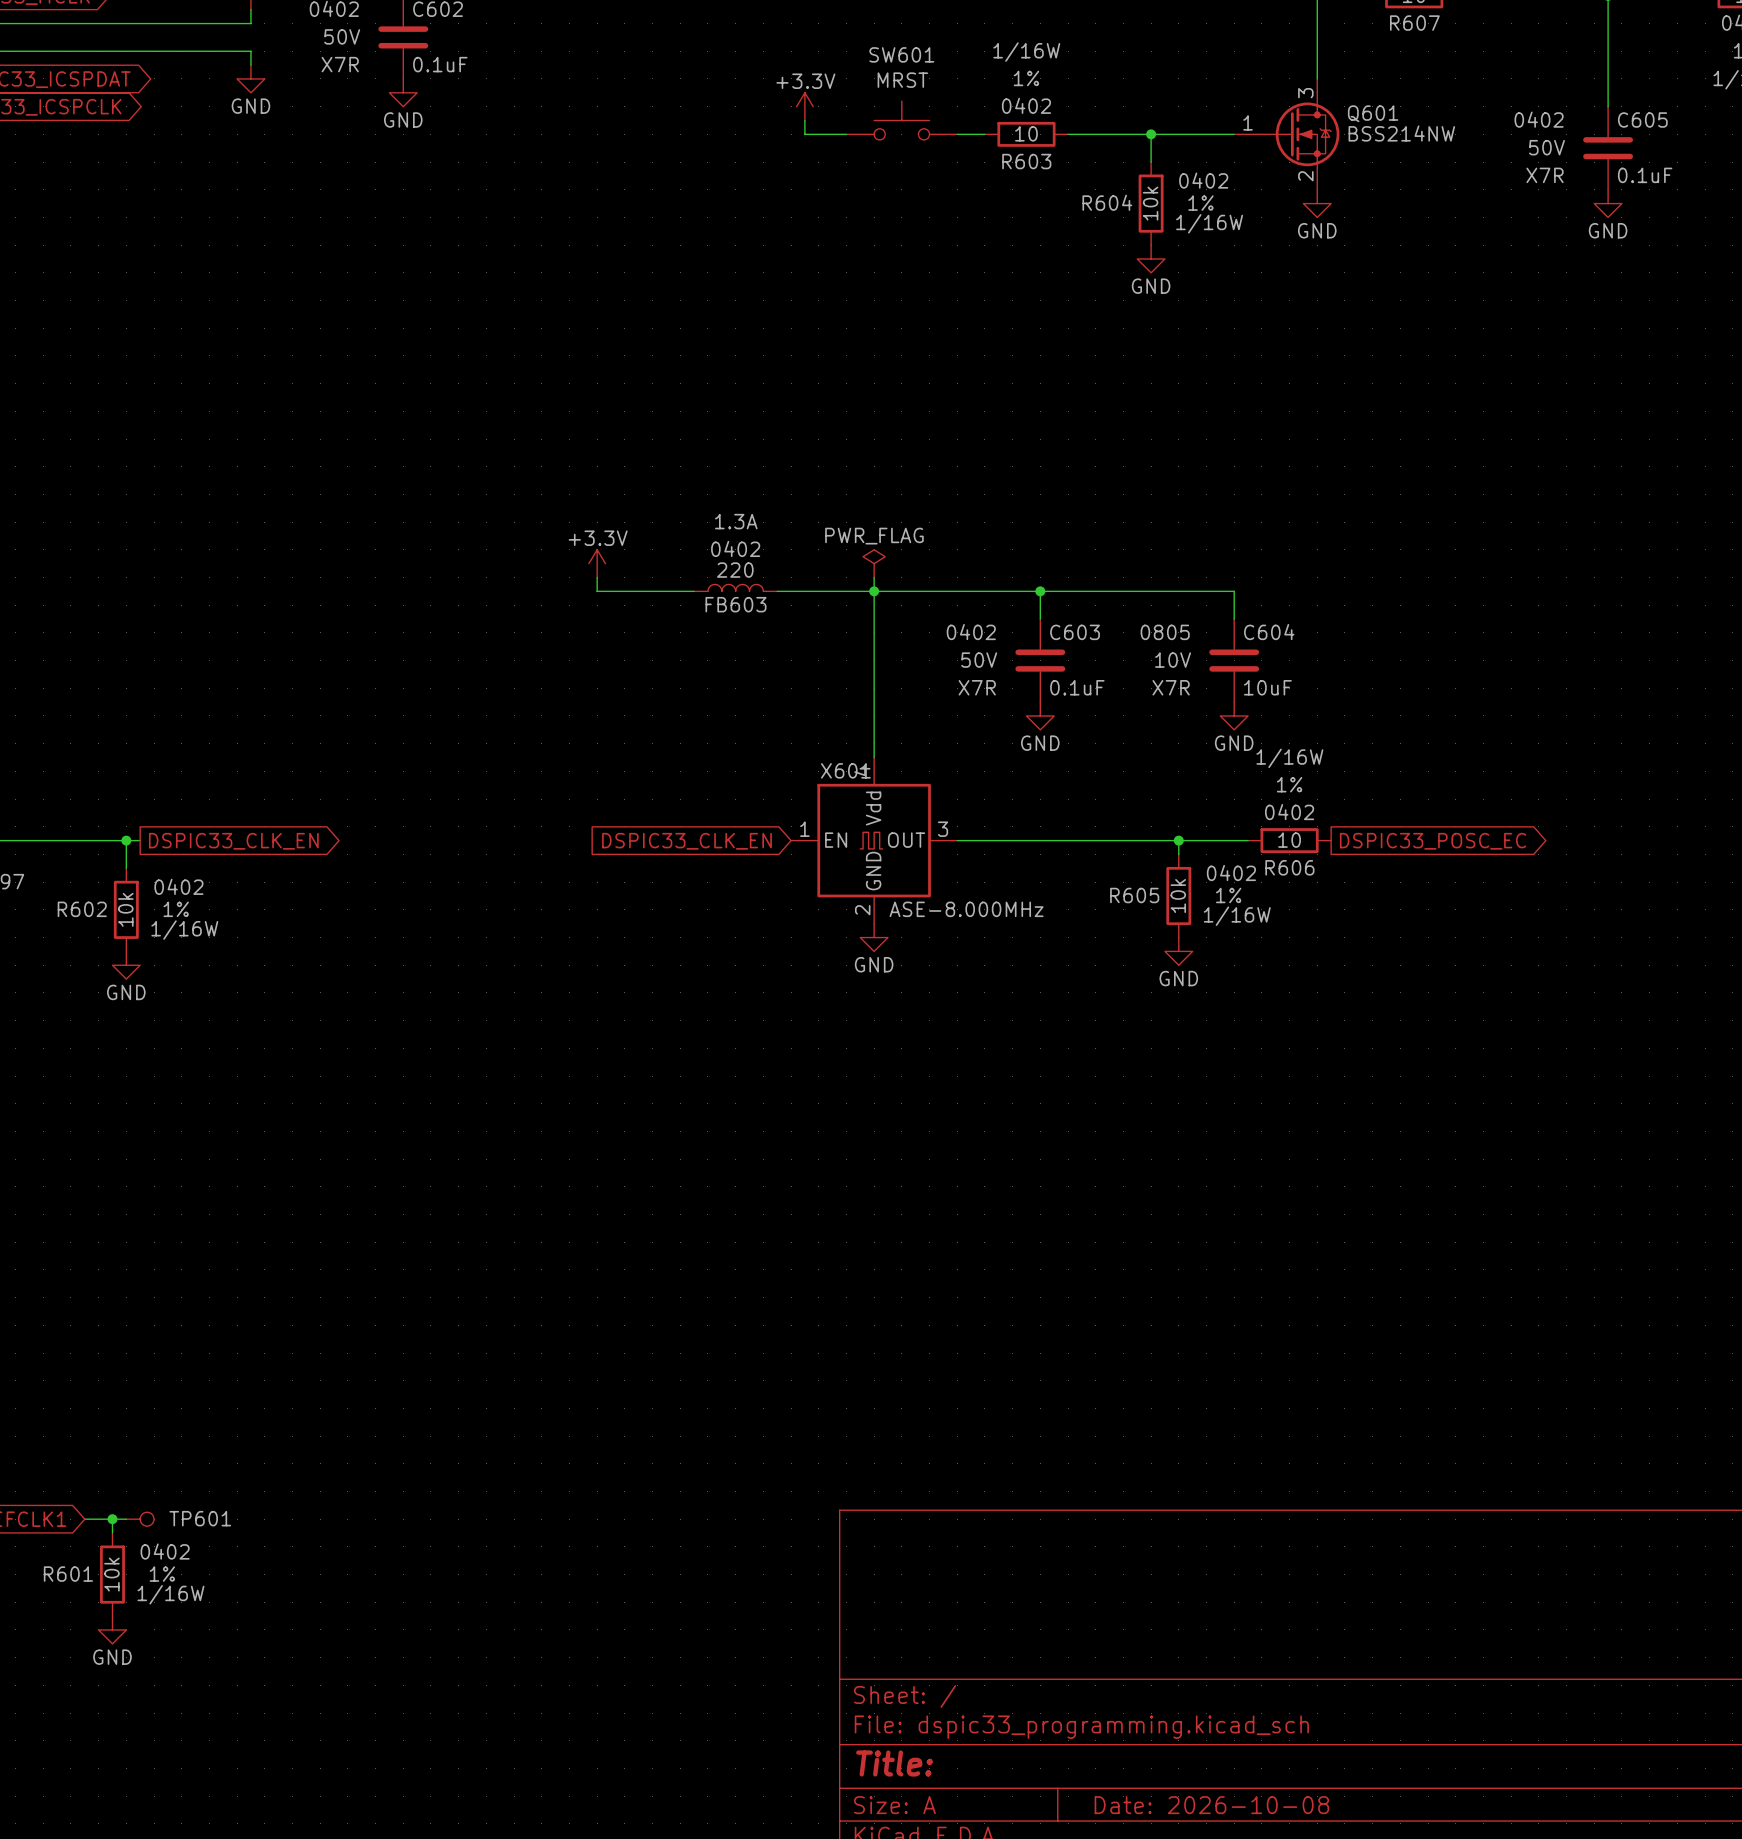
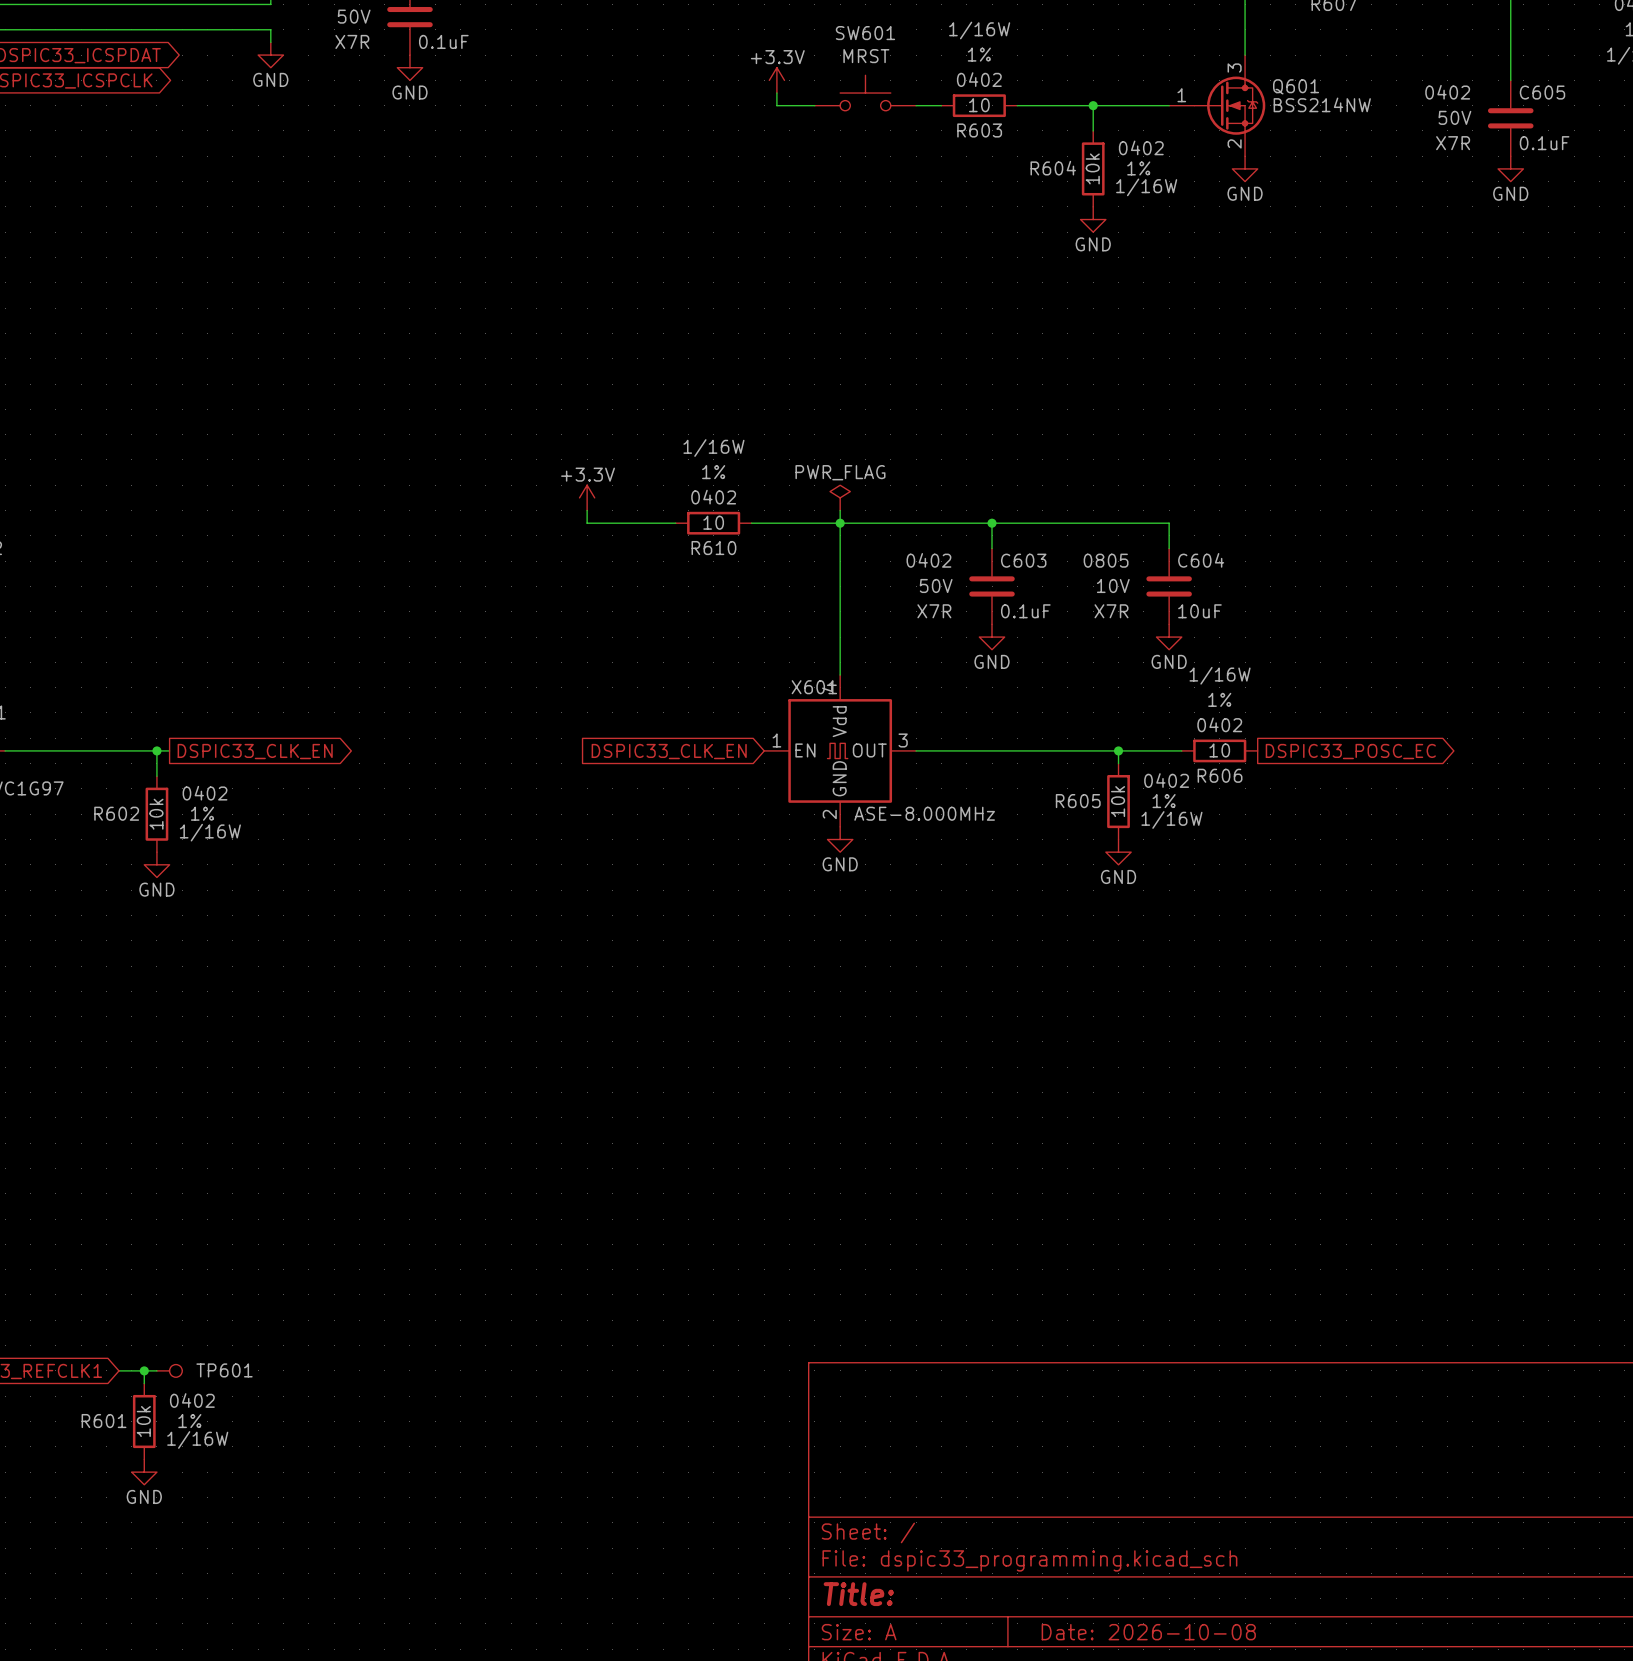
FB603: 220 (735, 587) -> none
R610: none -> 10 (713, 523)

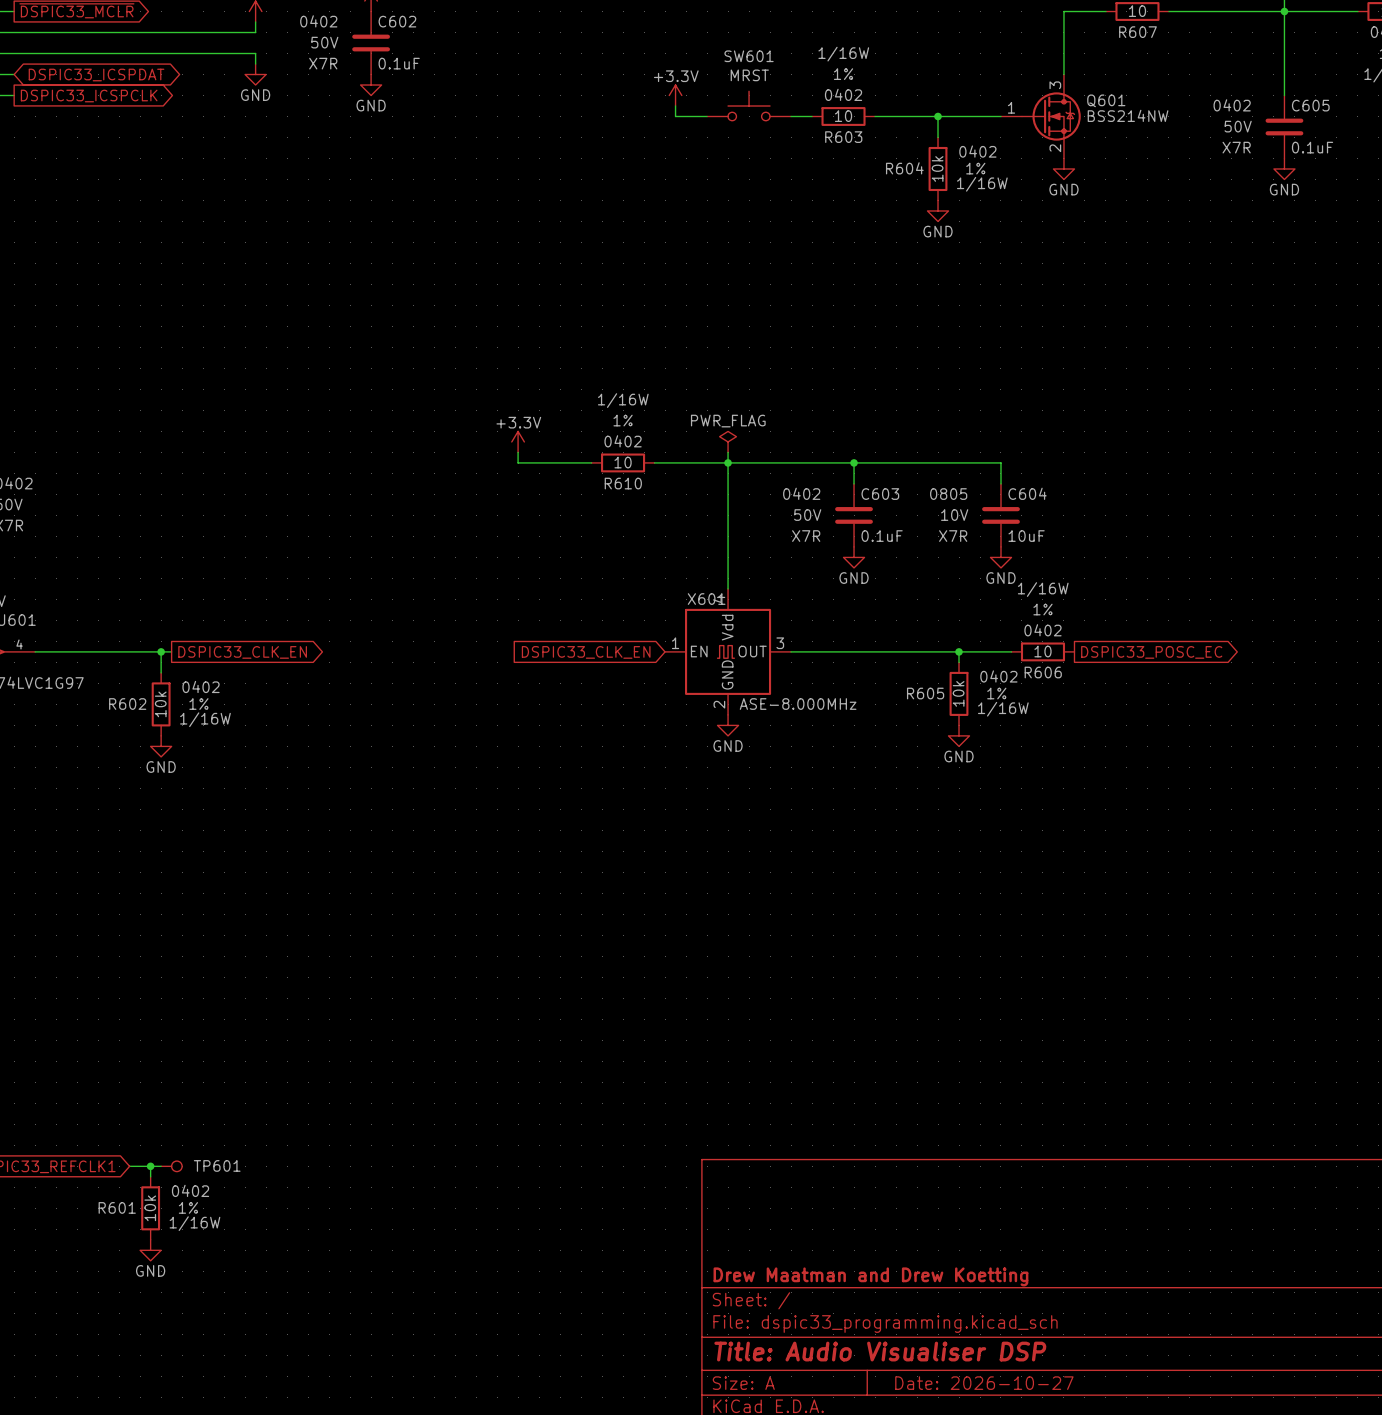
title block: none -> Drew Maatman and Drew Koetting (870, 1276)
title block: Title: (858, 1594) -> Title: Audio Visualiser DSP (880, 1351)
title block: Date: 2026-10-08 (1148, 1632) -> Date: 2026-10-27 (984, 1383)

